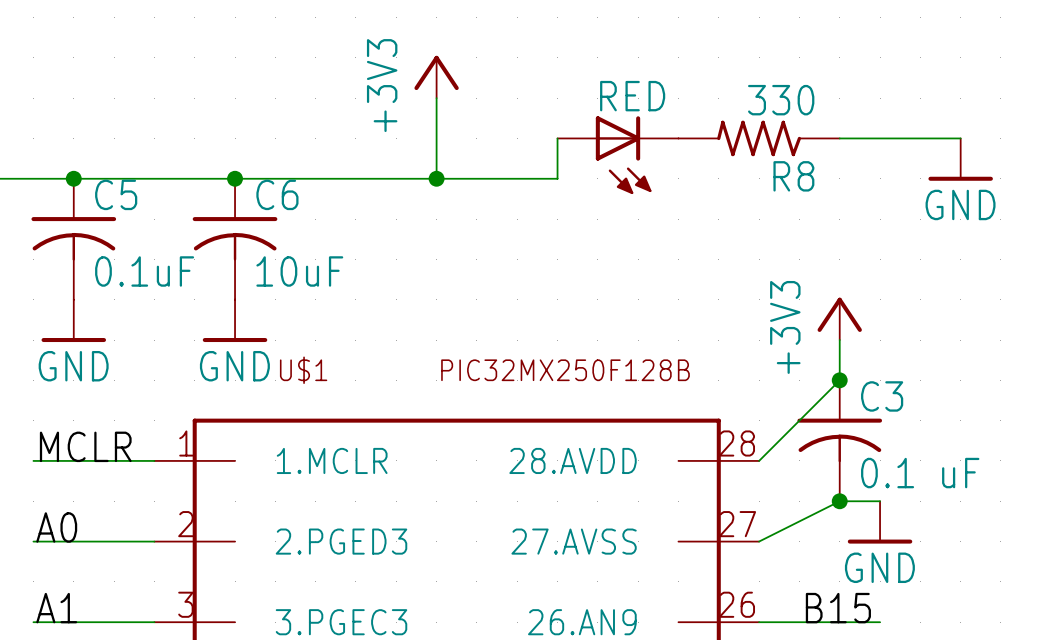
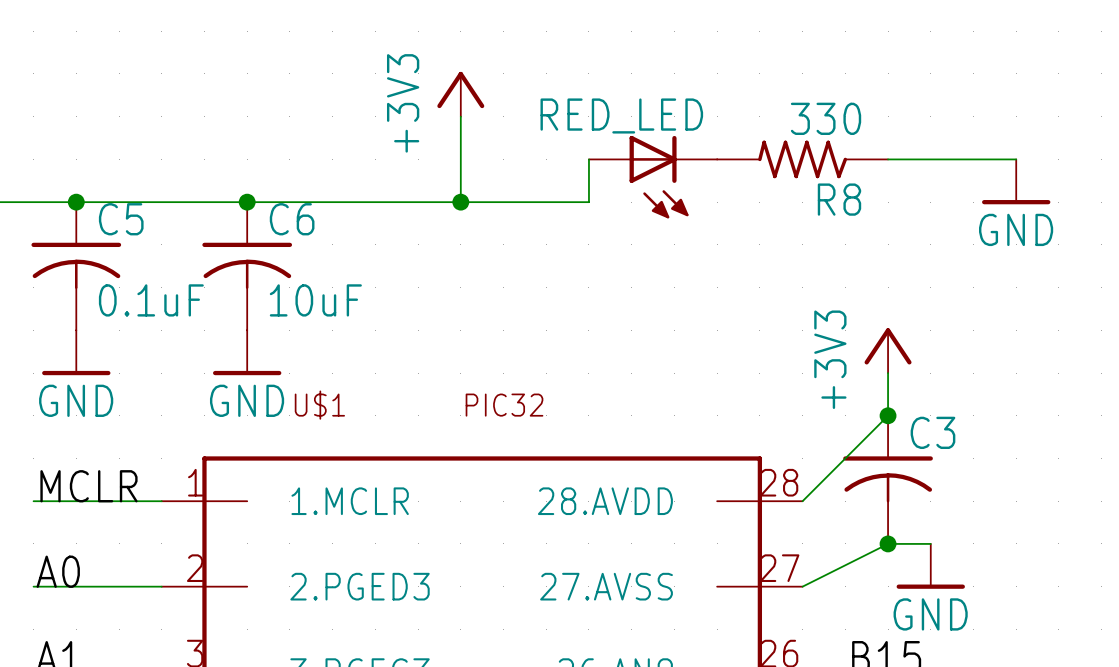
RED name: RED (632, 96) -> RED_LED (621, 115)
U$1 value: PIC32MX250F128B (565, 370) -> PIC32 (504, 405)
C3 value: 0.1 uF (920, 473) -> none

